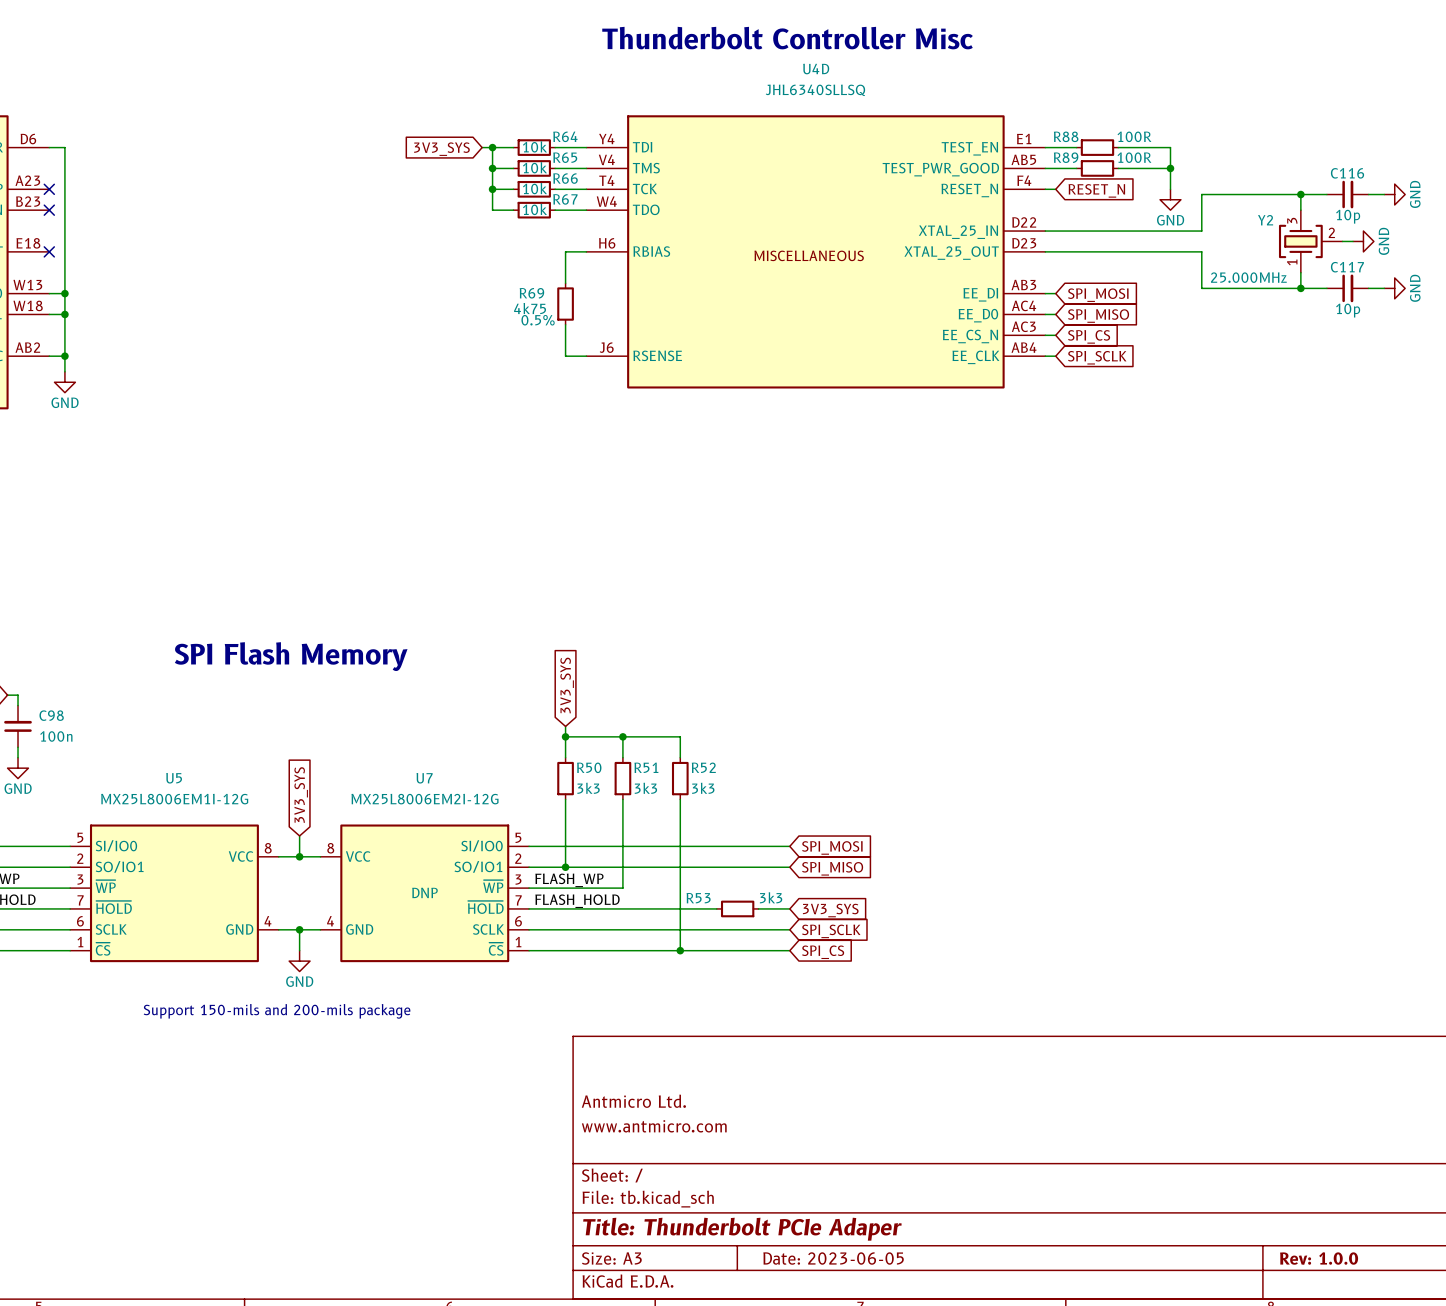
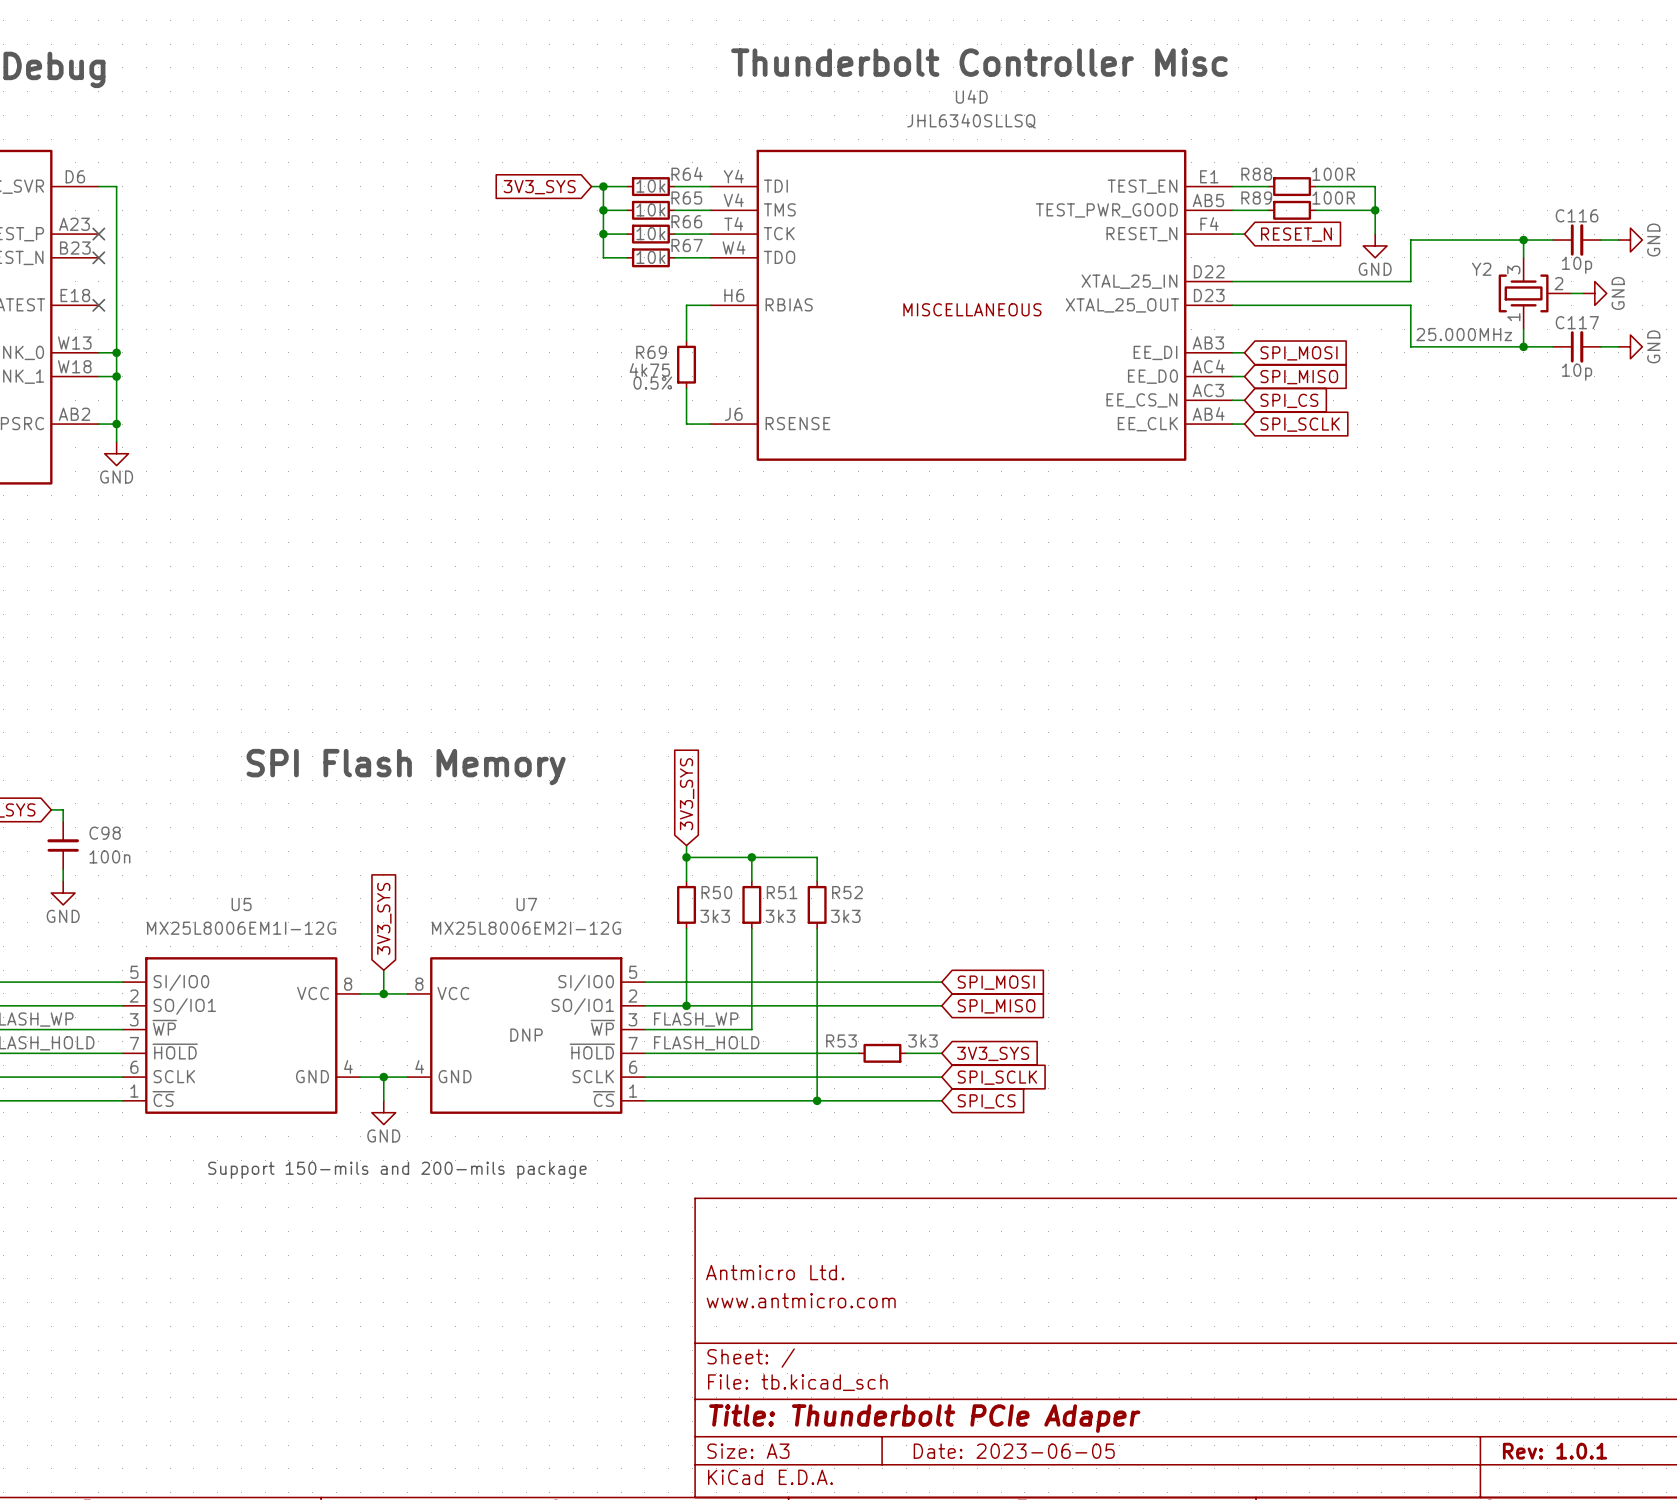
title block: Rev: 1.0.0 (1319, 1258) -> Rev: 1.0.1 (1555, 1451)

